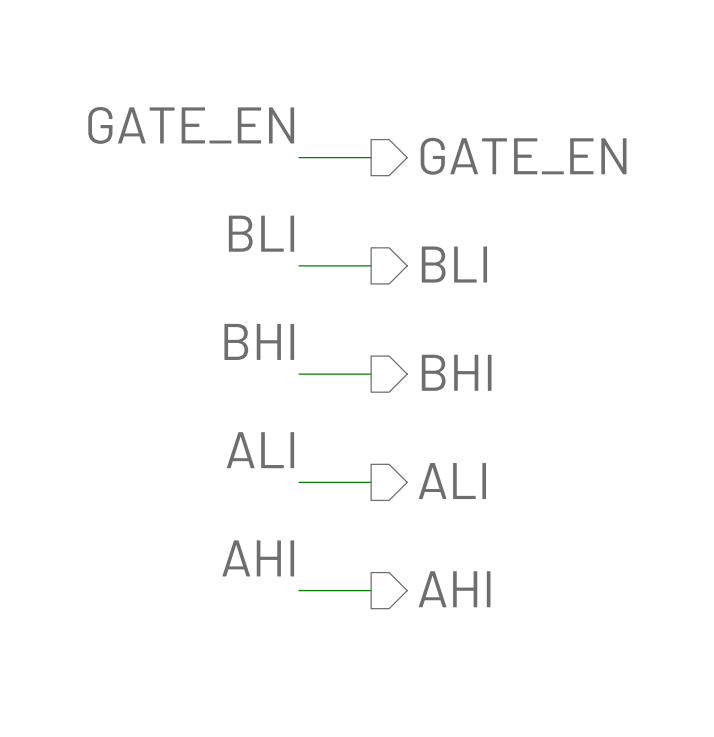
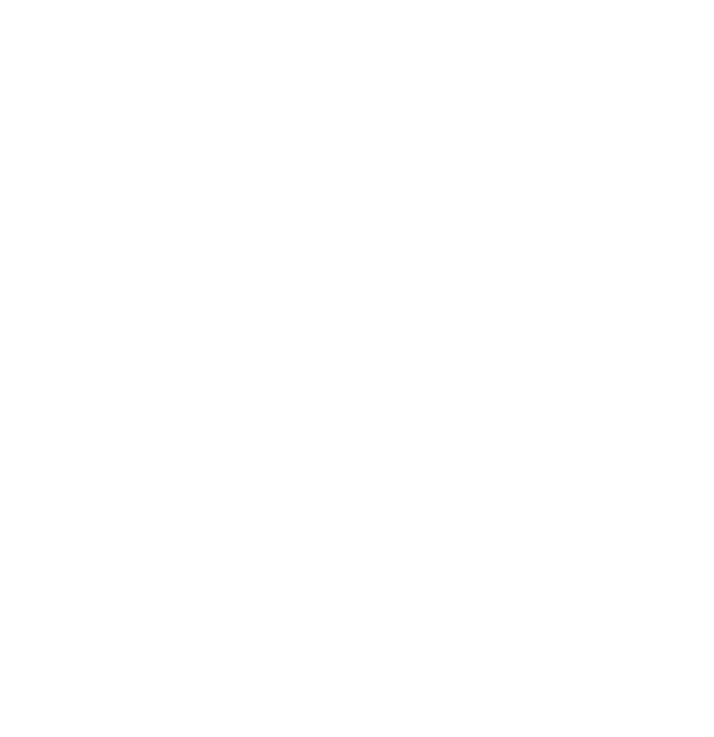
label: GATE_EN (191, 125) -> none
hierarchical label: GATE_EN (523, 156) -> none
wire: (298, 157) (371, 157) -> none
label: BLI (261, 233) -> none
hierarchical label: BLI (454, 264) -> none
wire: (298, 265) (371, 265) -> none
label: BHI (259, 341) -> none
hierarchical label: BHI (456, 372) -> none
wire: (298, 374) (371, 374) -> none
label: ALI (260, 450) -> none
hierarchical label: ALI (452, 481) -> none
wire: (298, 482) (371, 482) -> none
label: AHI (258, 558) -> none
hierarchical label: AHI (454, 589) -> none
wire: (298, 590) (371, 590) -> none

